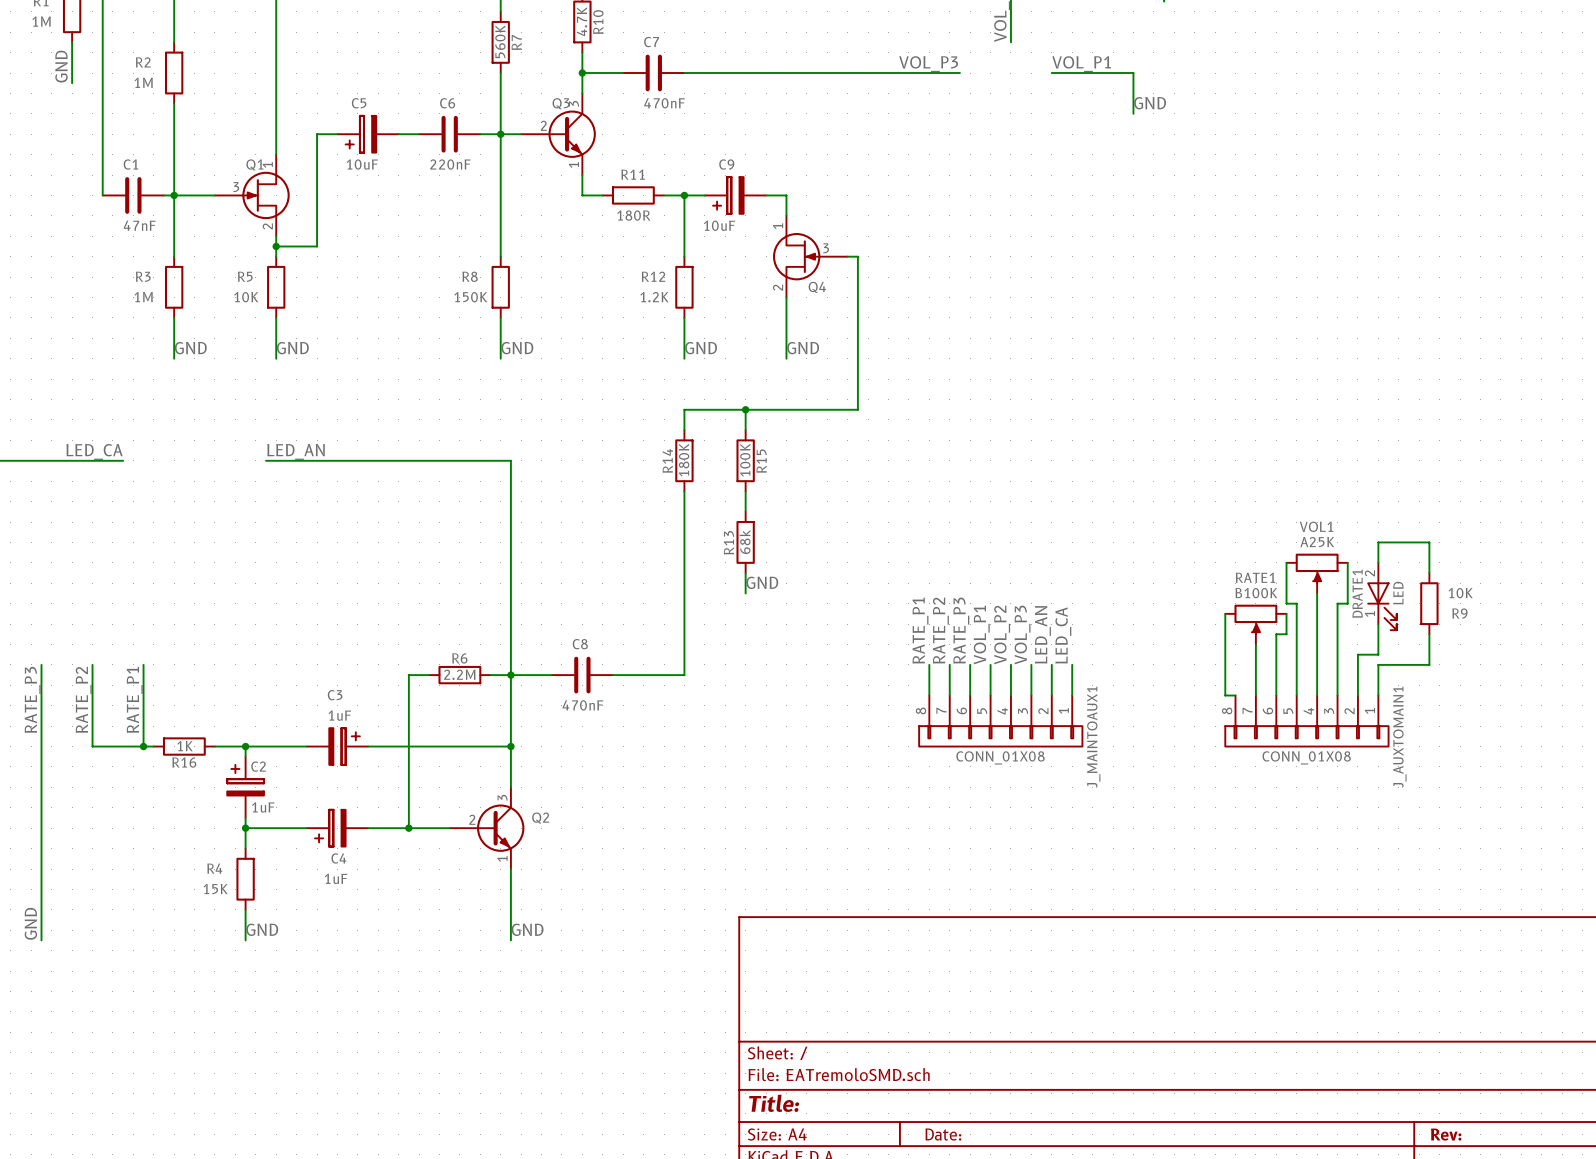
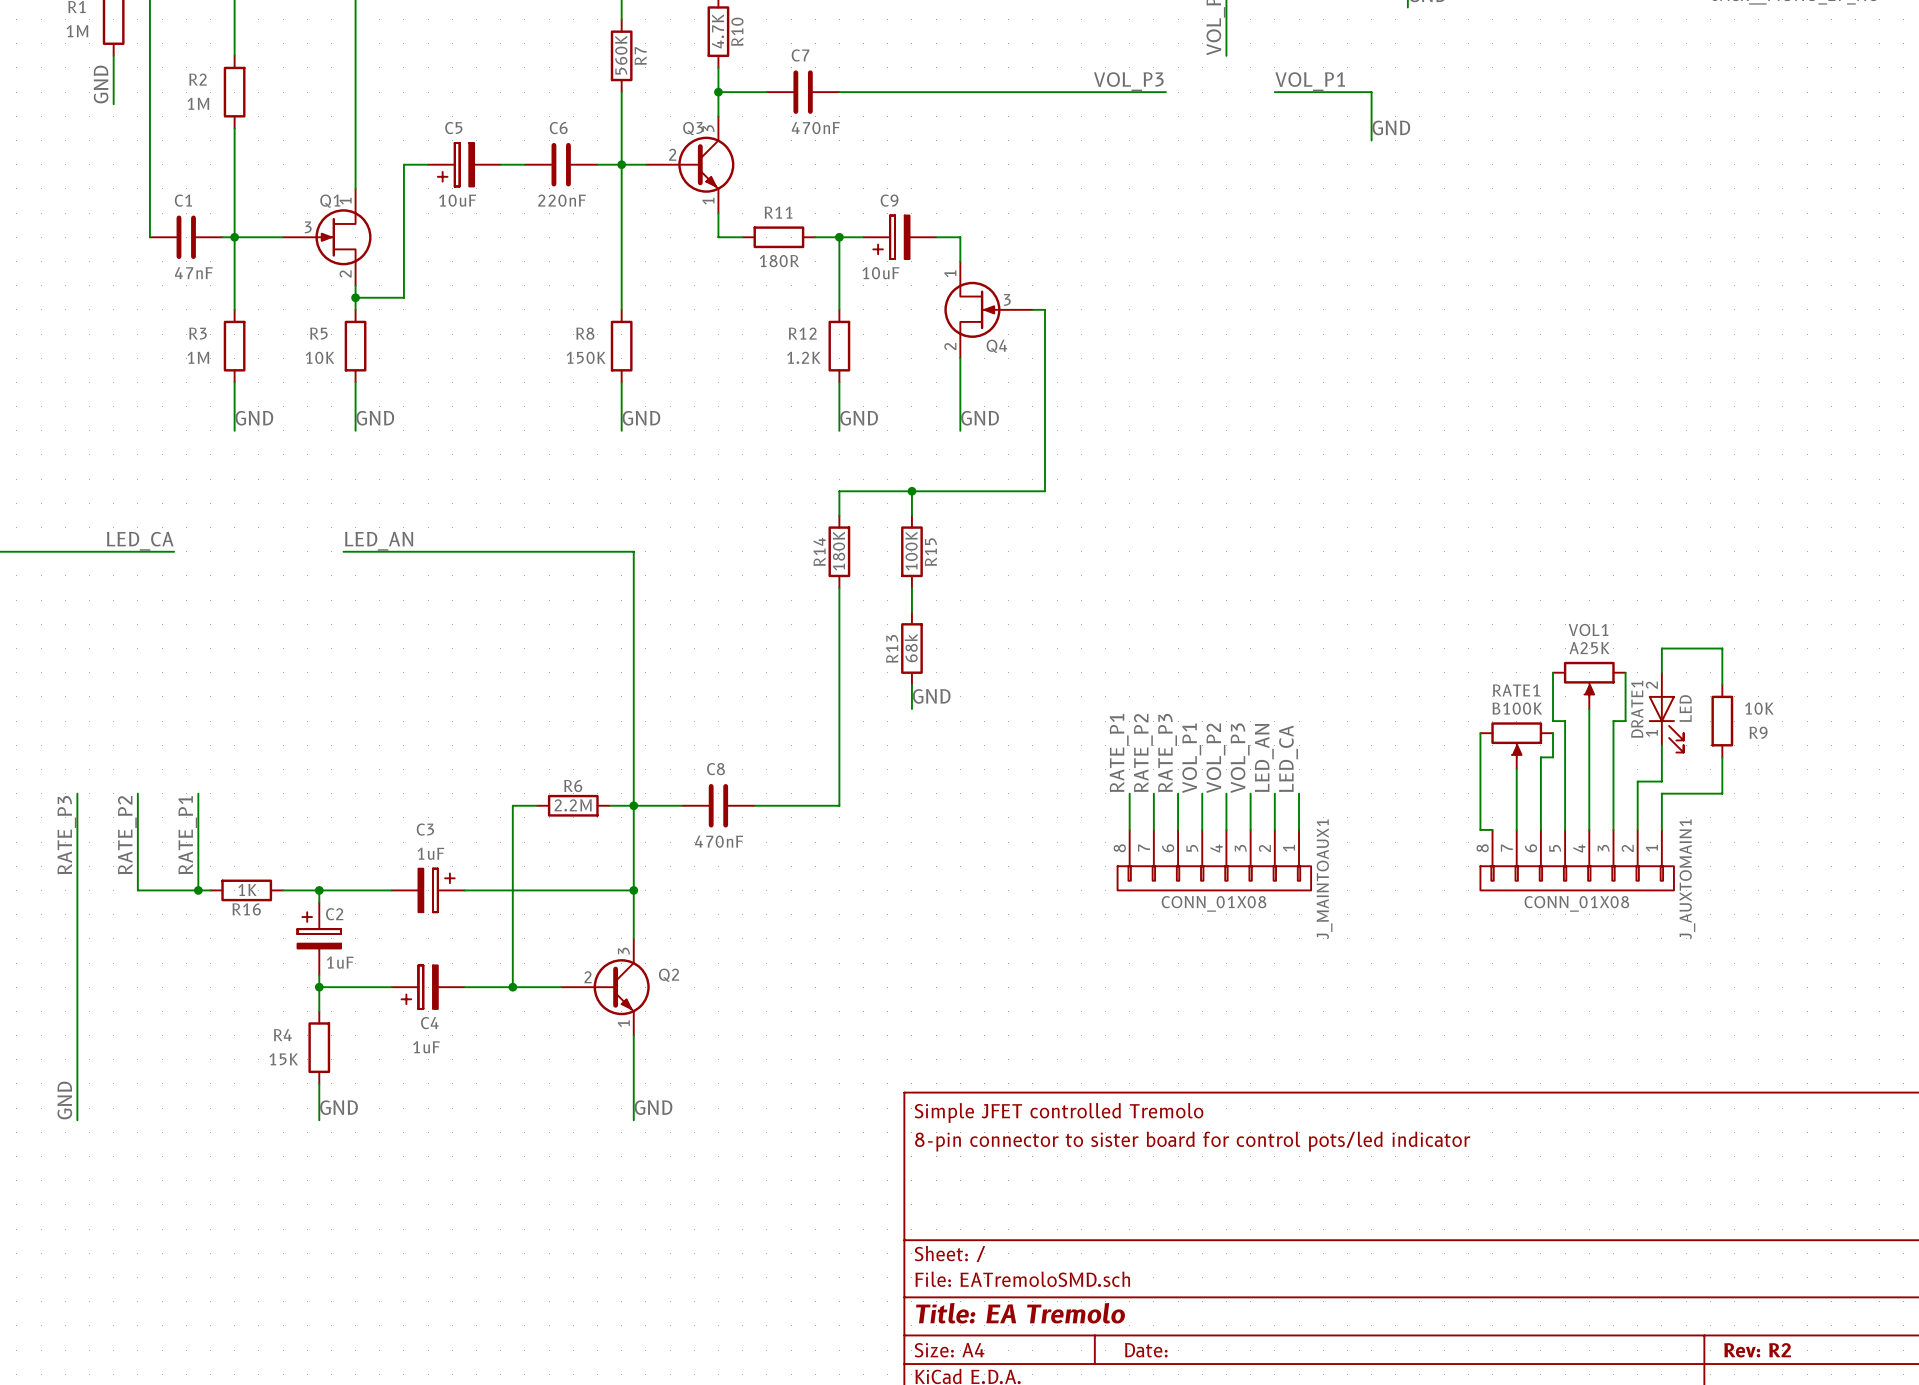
title block: none -> Simple JFET controlled Tremolo (1059, 1112)
title block: none -> 8-pin connector to sister board for control pots/led indicator (1192, 1141)
title block: Title: (774, 1103) -> Title: EA Tremolo (1020, 1313)
title block: Rev: (1446, 1134) -> Rev: R2 (1757, 1350)

